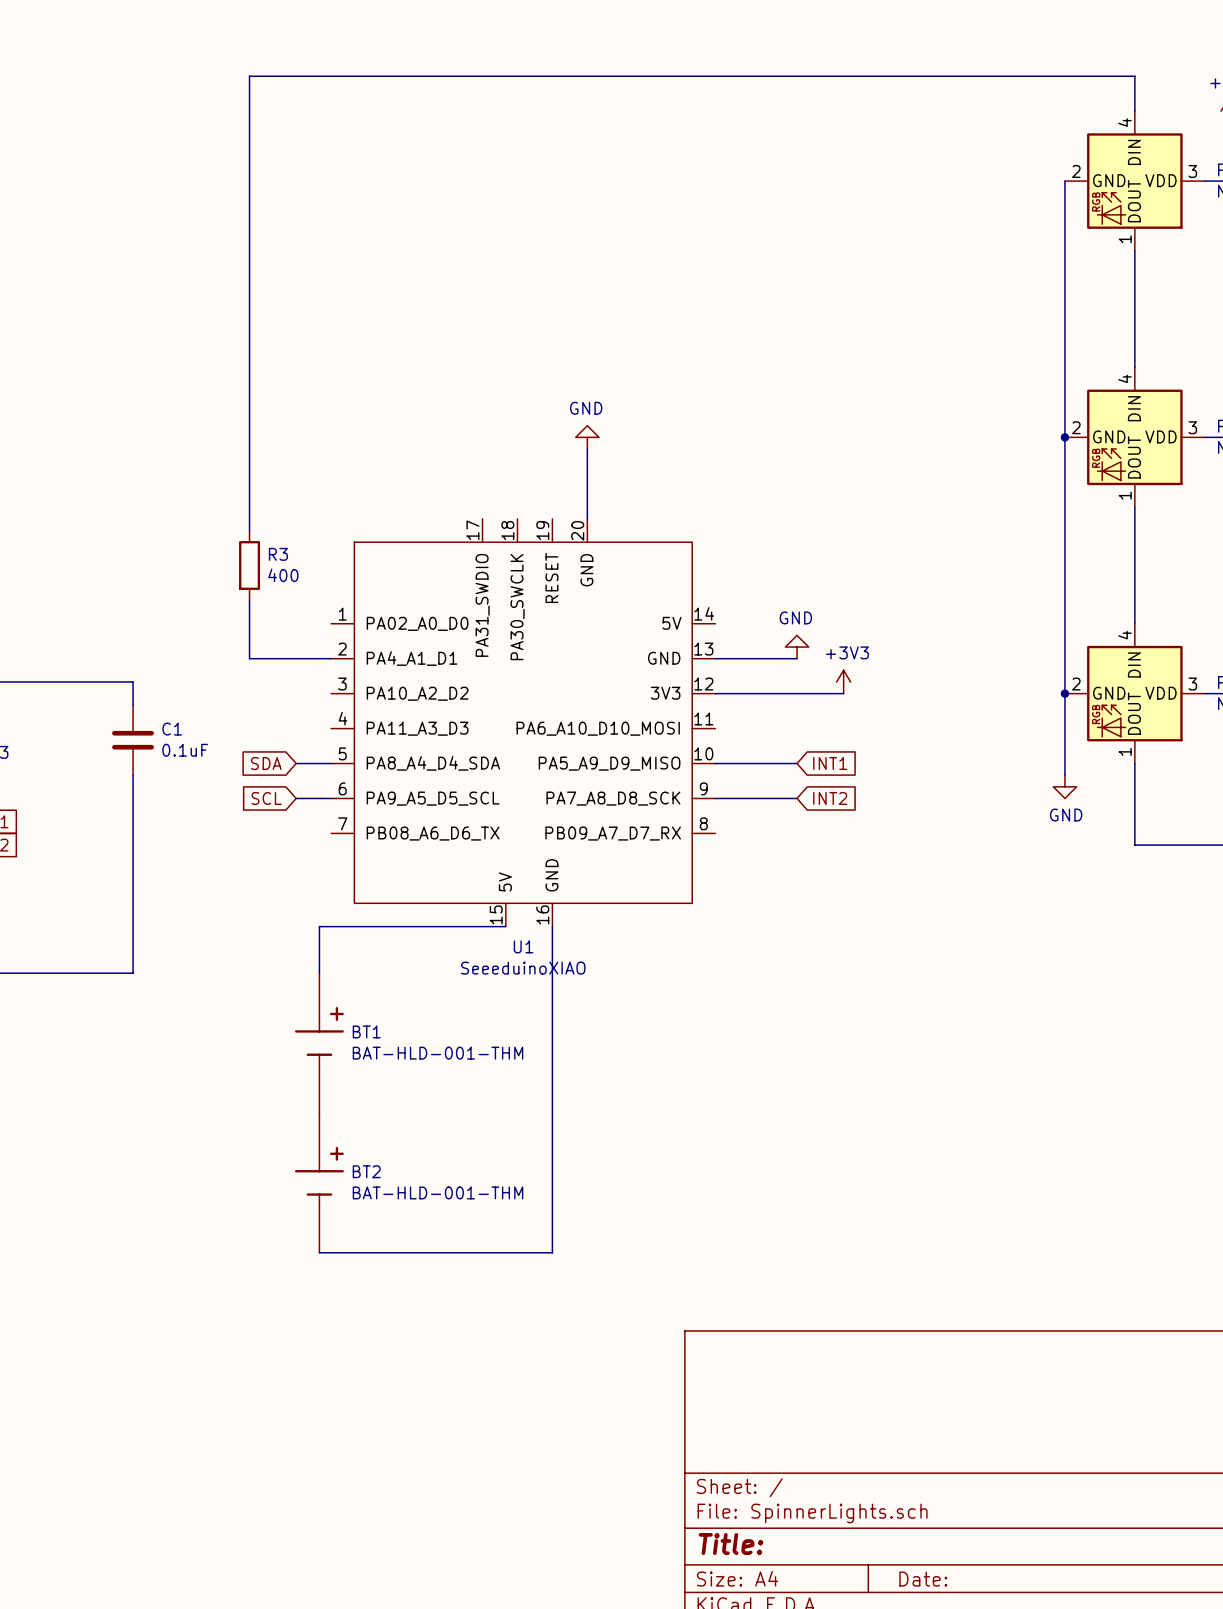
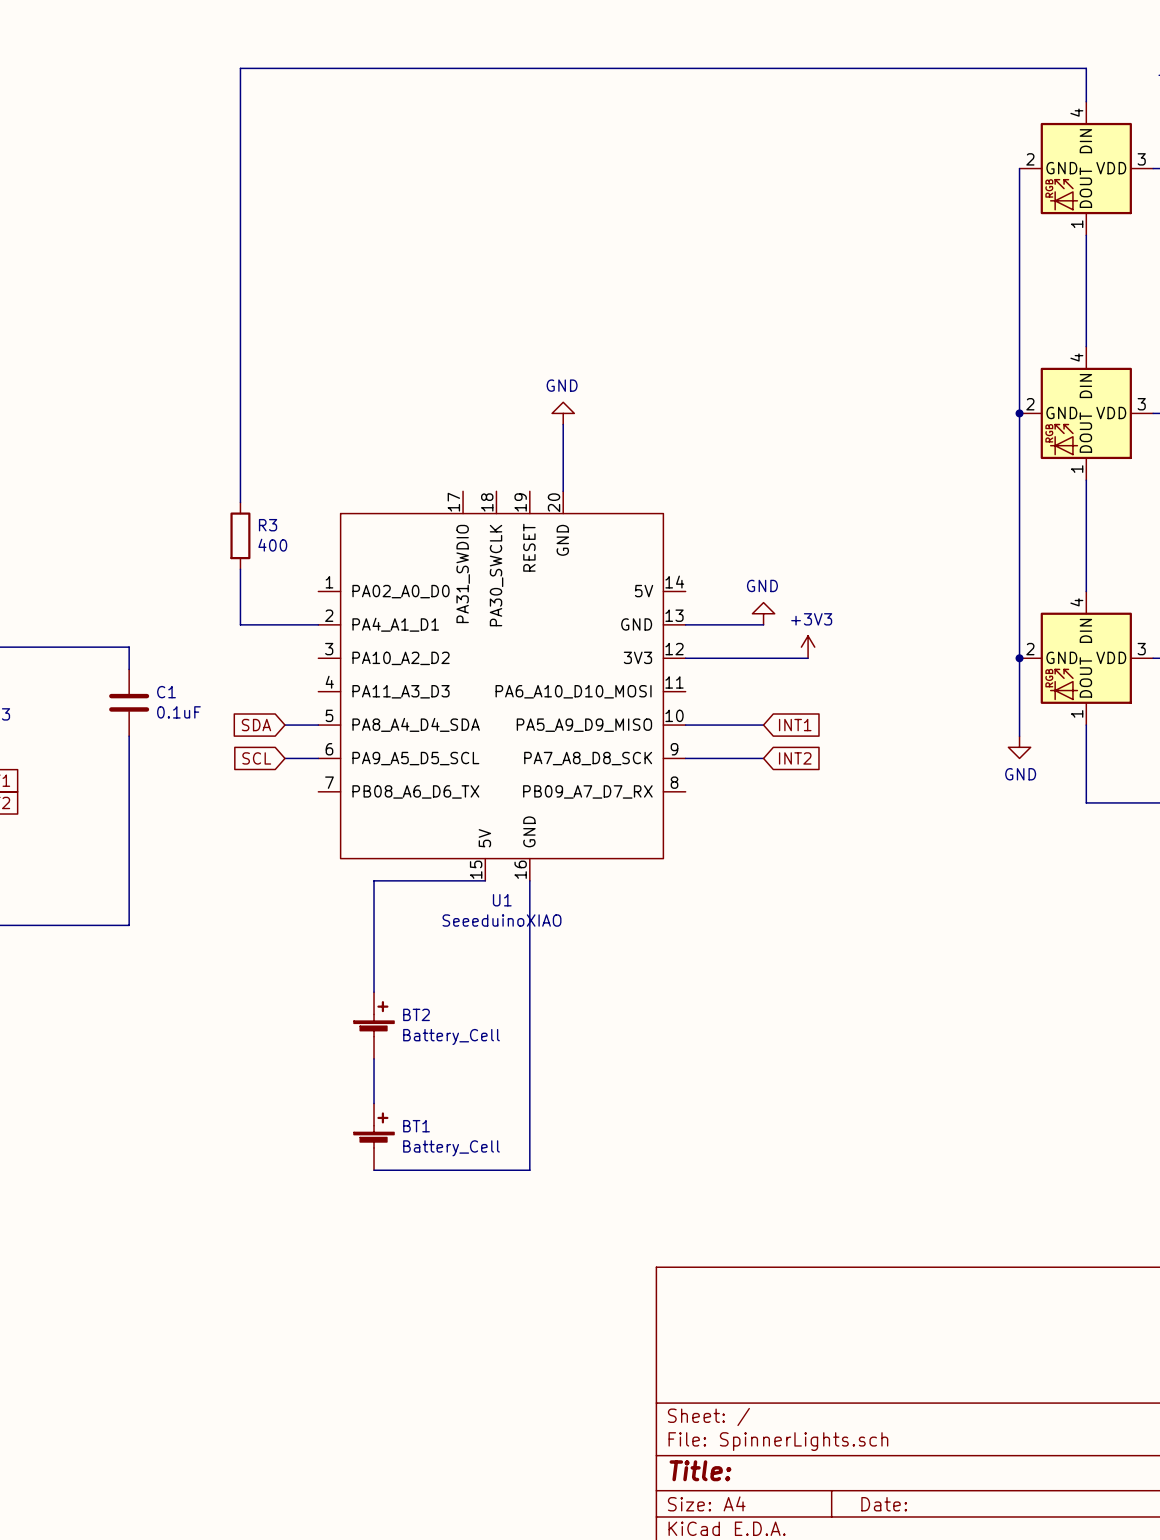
wire: (389, 926) (319, 926) (319, 973) -> (374, 880) (374, 992)
BT1 symbol: [294, 973, 344, 1114] -> [353, 1103, 395, 1171]
BT1 value: BAT-HLD-001-THM (438, 1053) -> Battery_Cell (451, 1148)
BT2 symbol: [294, 1113, 344, 1253] -> [353, 992, 395, 1059]
wire: none -> (374, 1058) (374, 1103)
BT2 value: BAT-HLD-001-THM (438, 1192) -> Battery_Cell (451, 1037)
wire: (552, 1229) (552, 1252) (319, 1252) -> (529, 1170) (374, 1170)

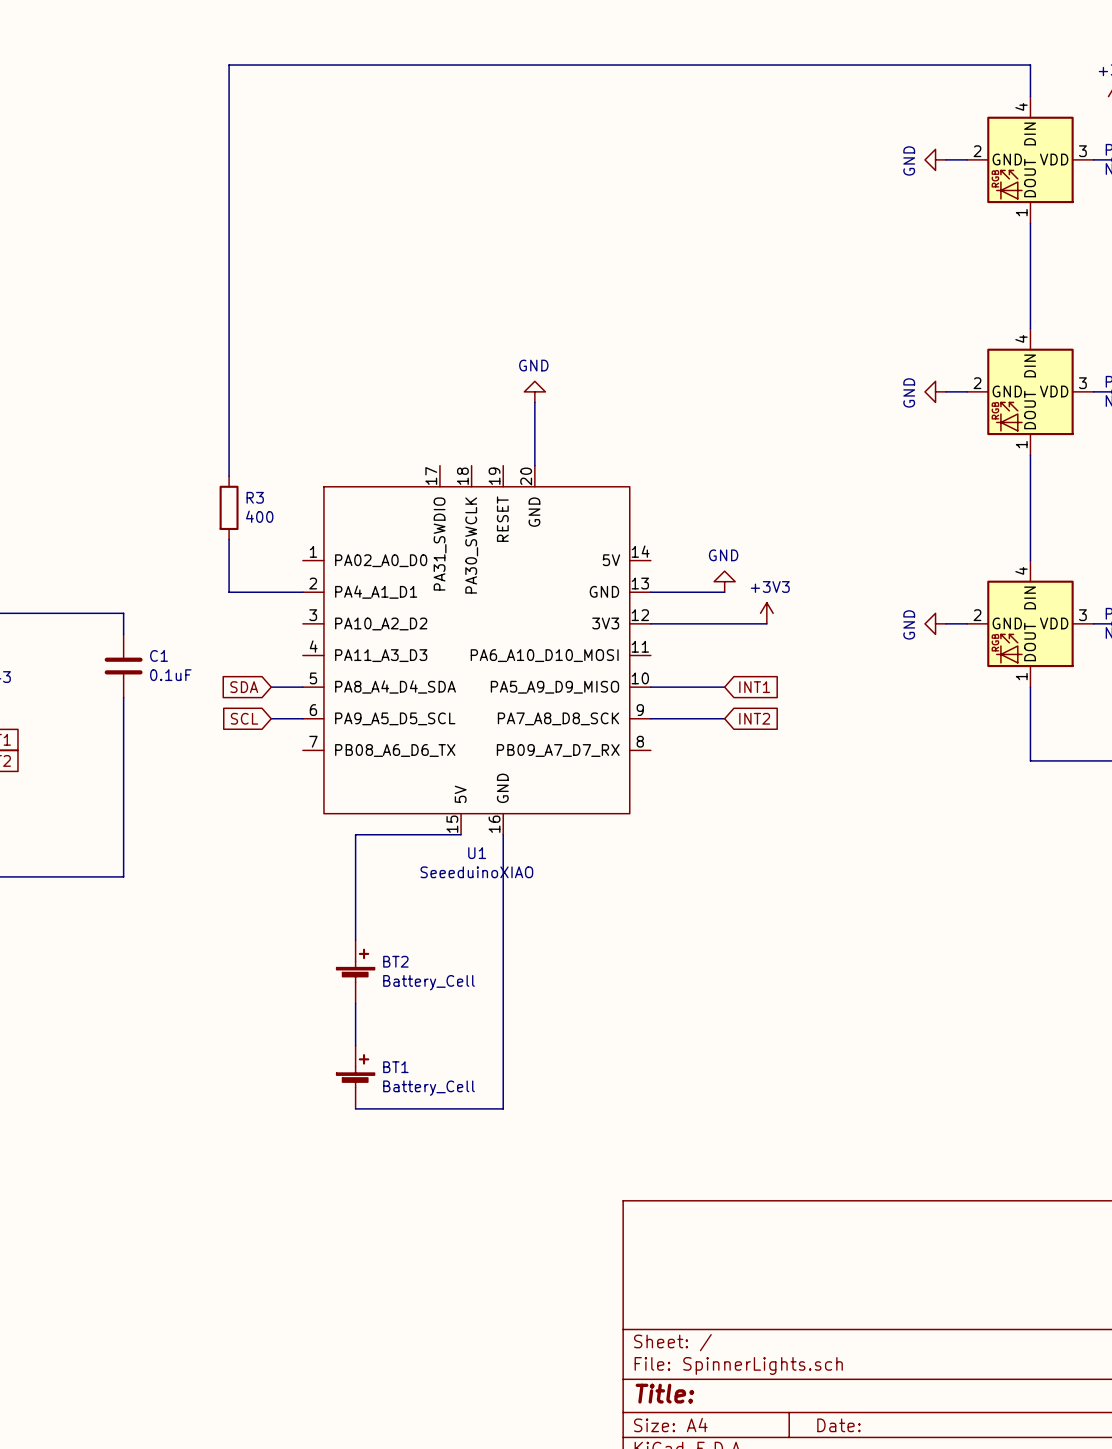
power symbol: none -> GND (935, 159)
wire: (1019, 168) (1019, 736) -> (967, 159) (946, 159)
power symbol: none -> GND (935, 391)
wire: none -> (946, 391) (967, 391)
junction: (1019, 413) -> none
wire: none -> (946, 623) (967, 623)
junction: (1019, 658) -> none
power symbol rotation: 0° (1019, 747) -> 90° clockwise (935, 623)
power symbol position: GND (1019, 747) -> GND (935, 623)

